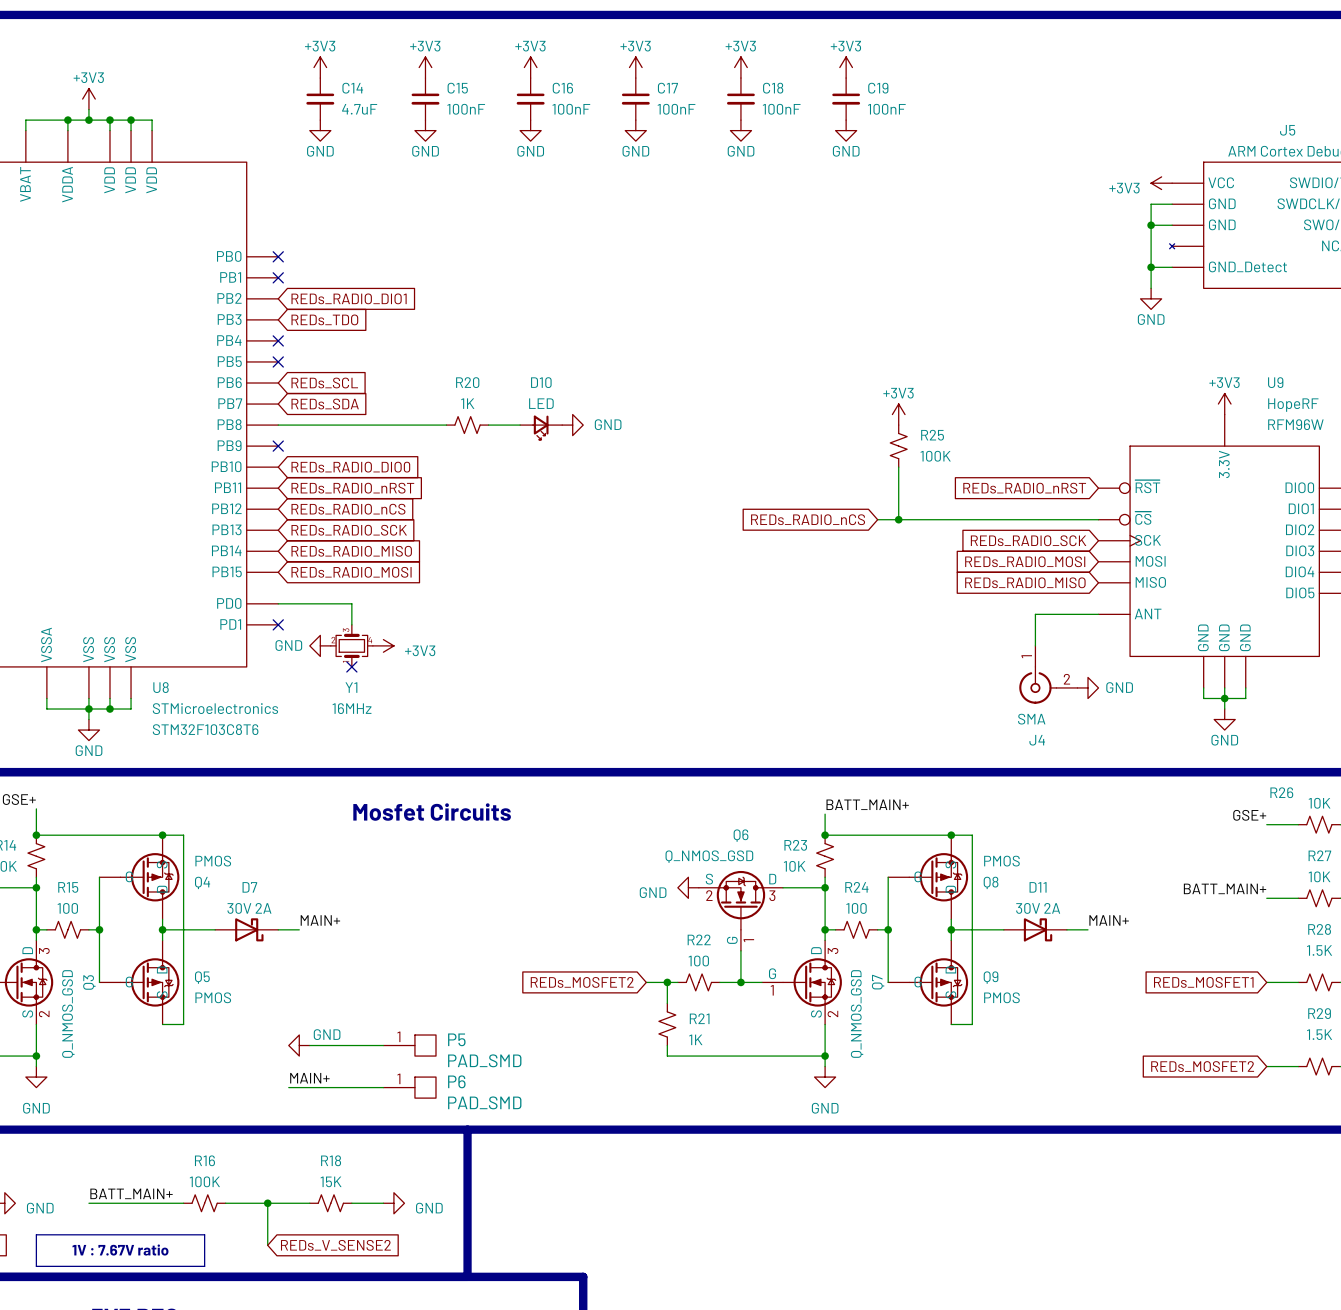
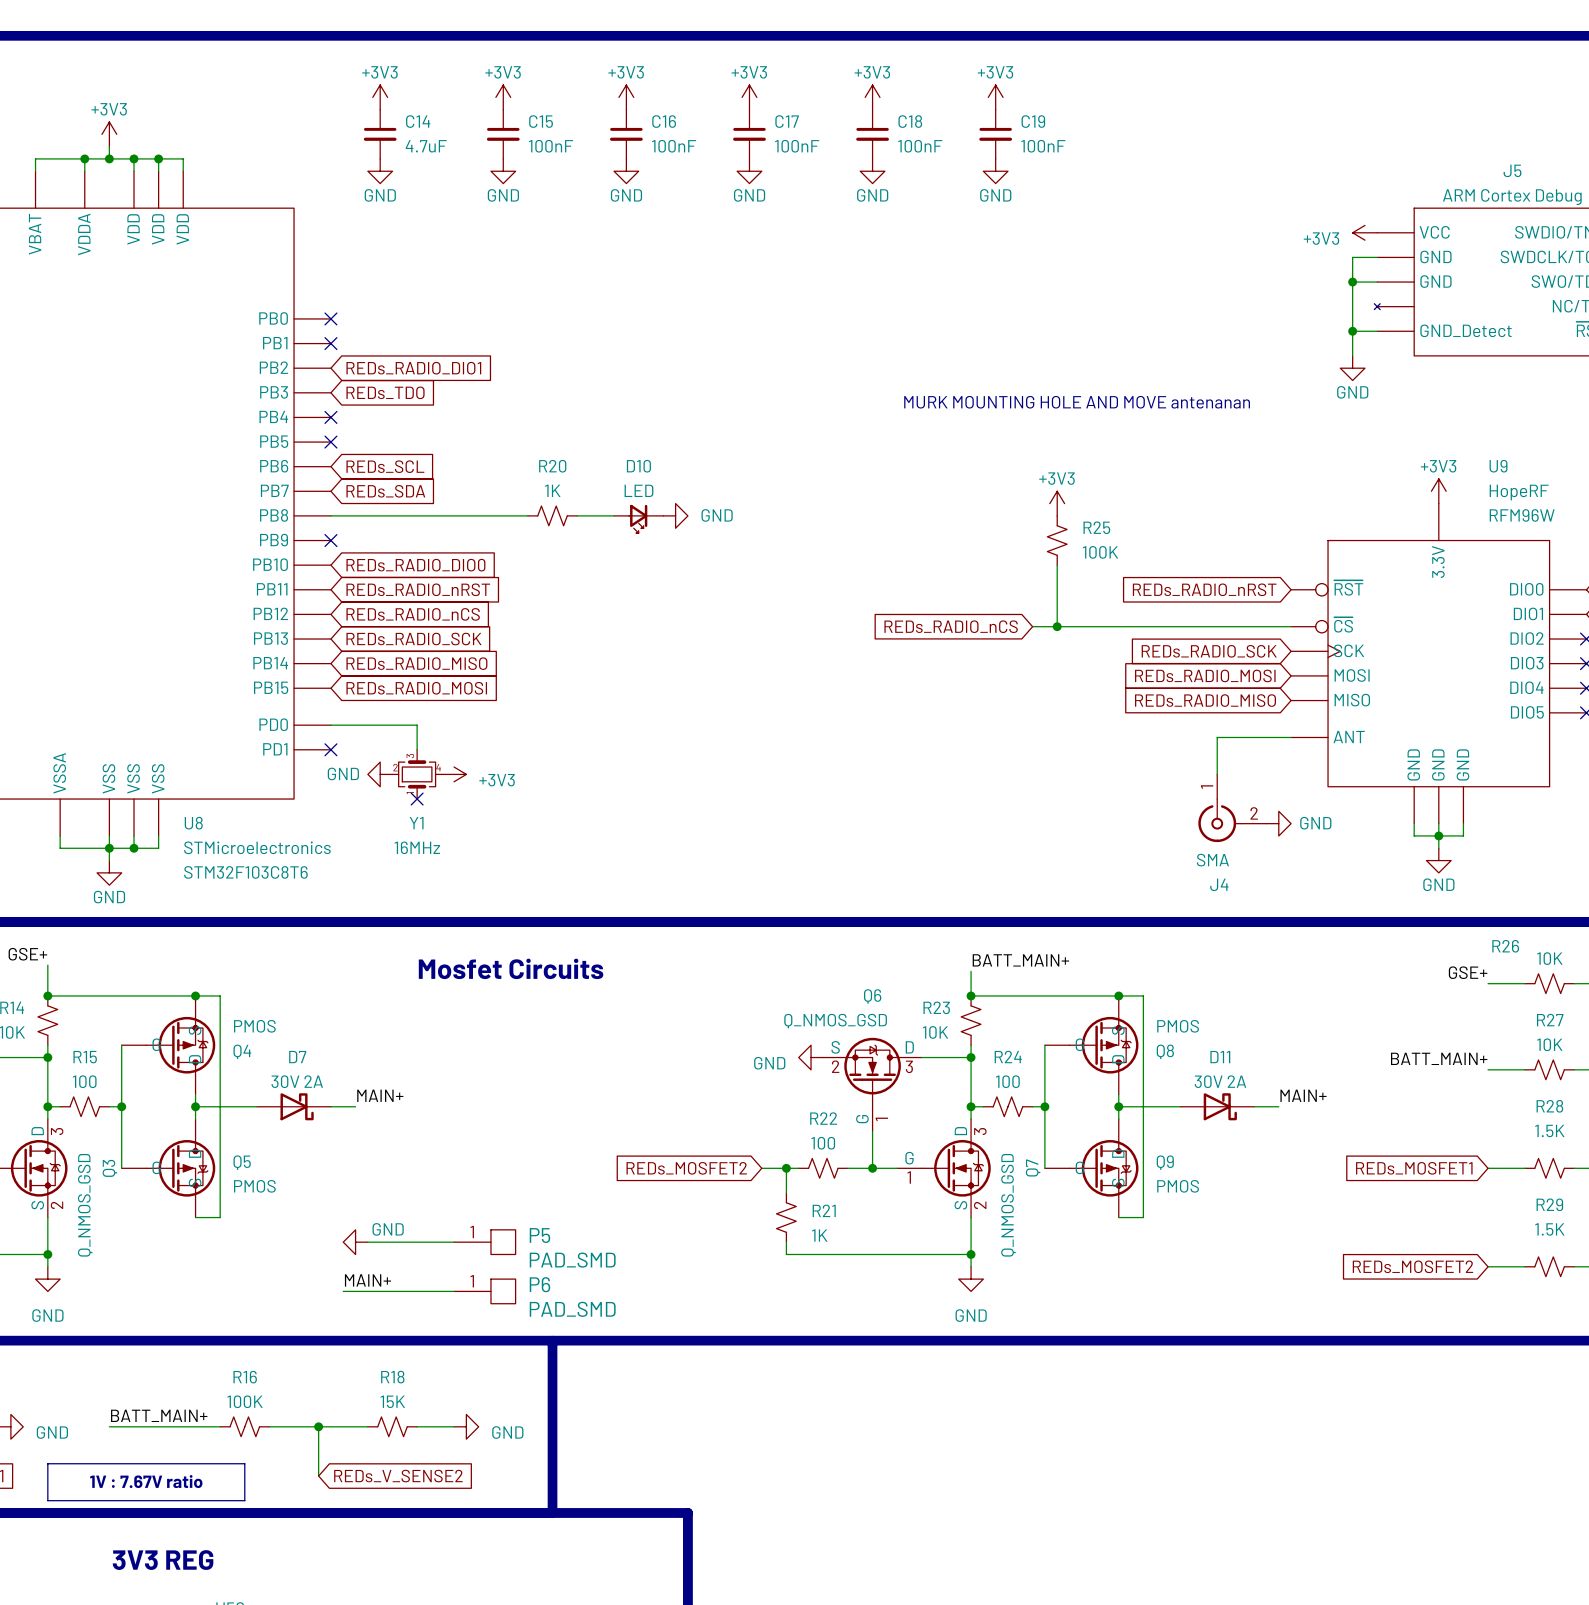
text: none -> MURK MOUNTING HOLE AND MOVE antenanan (1077, 402)

